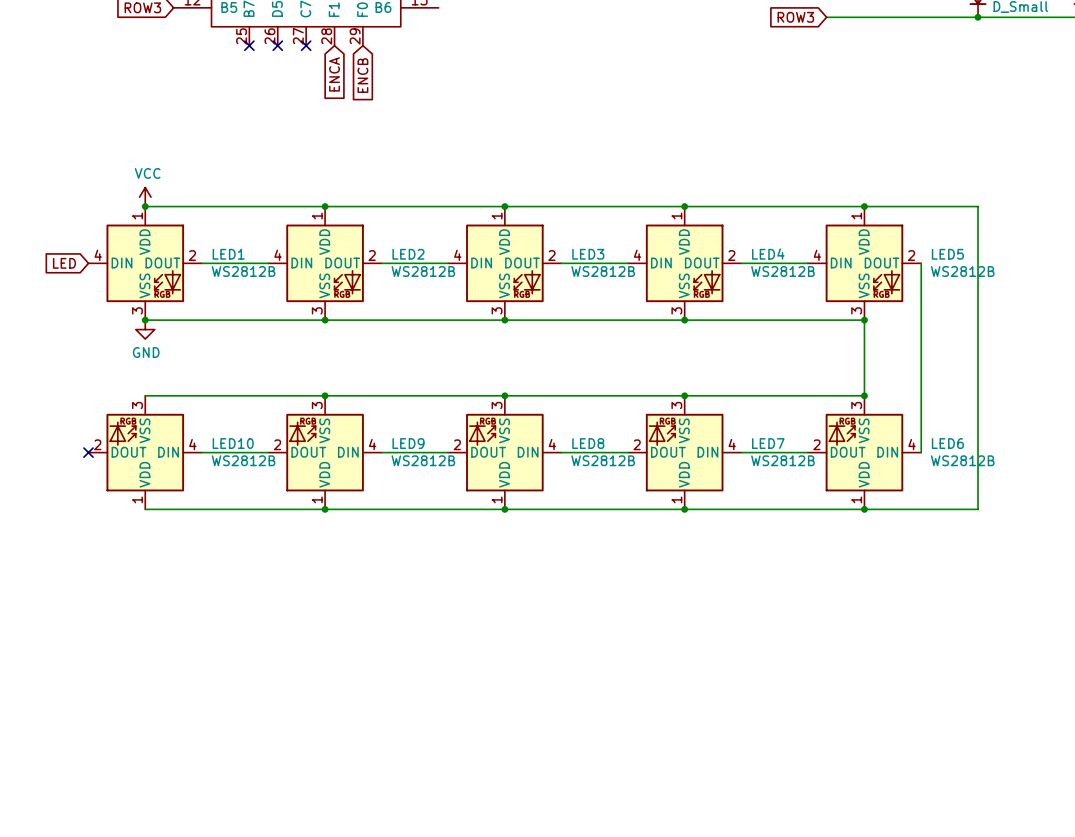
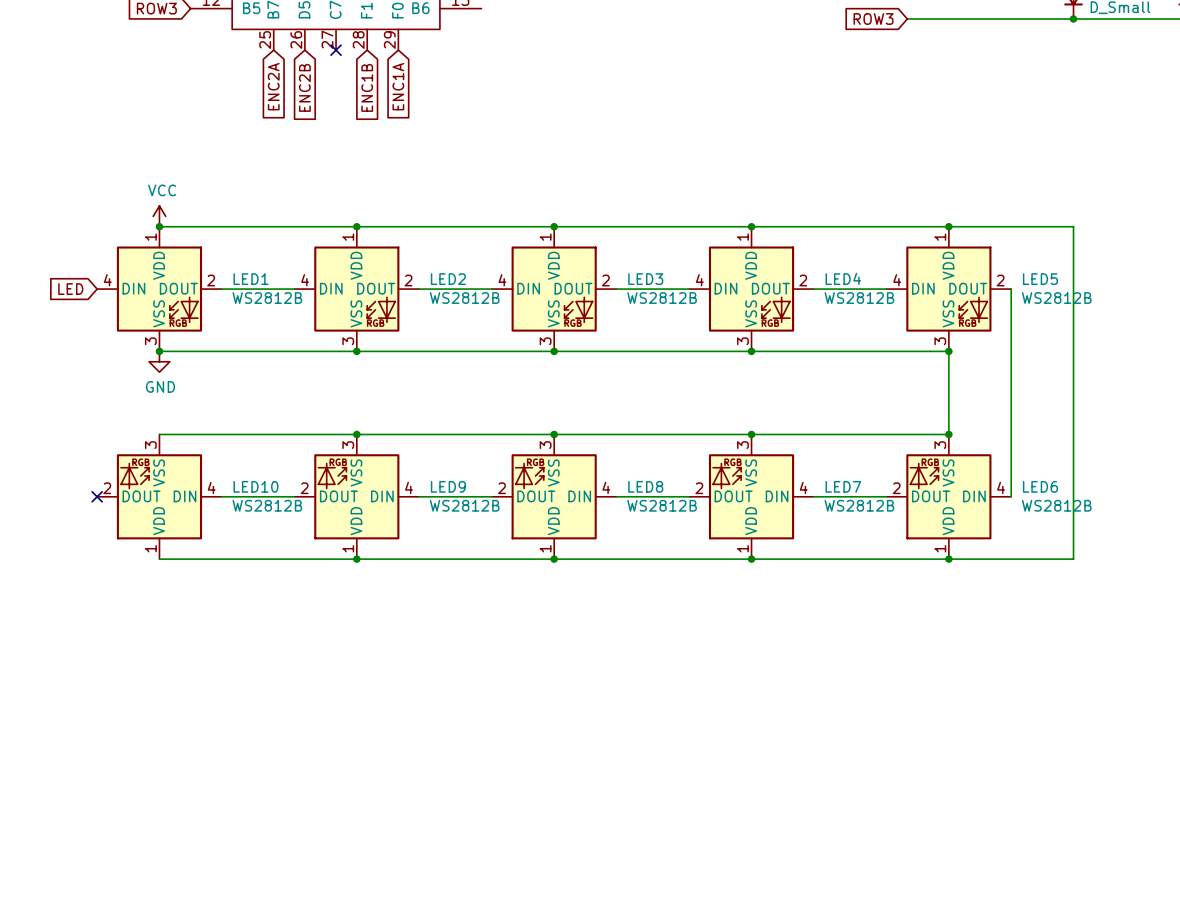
no-connect mark: (249, 45) -> none
no-connect mark: (277, 45) -> none
global label: ENCA (334, 74) -> ENC1B (367, 87)
global label: ENCB (362, 75) -> ENC1A (398, 86)
global label: none -> ENC2A (273, 86)
global label: none -> ENC2B (304, 87)

